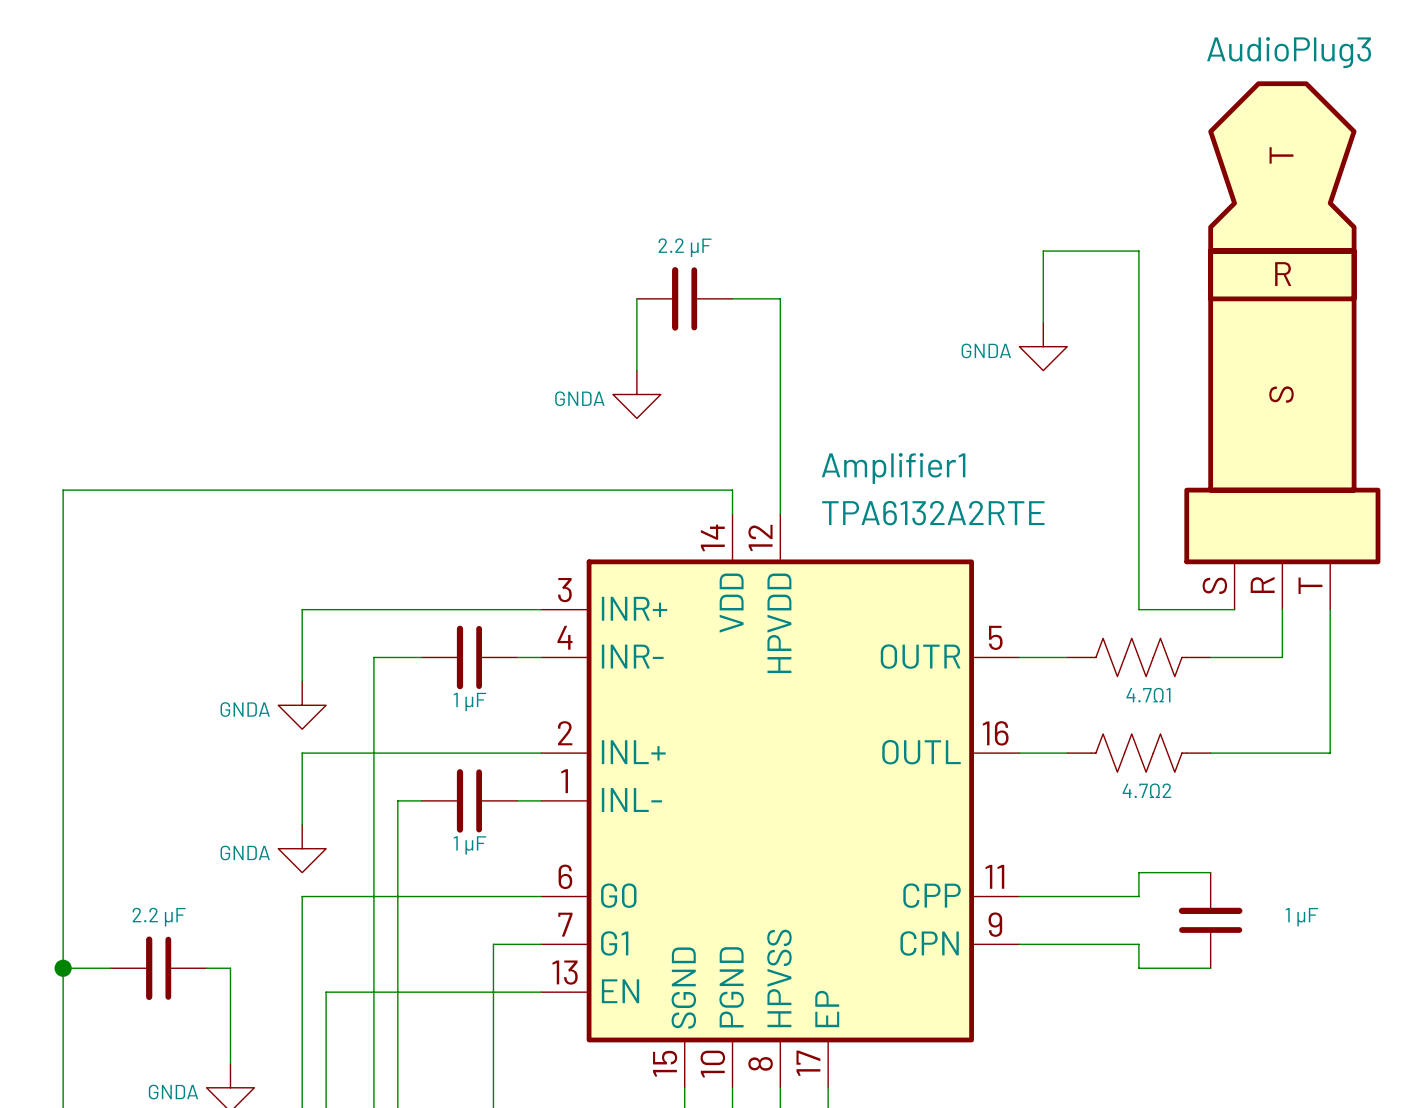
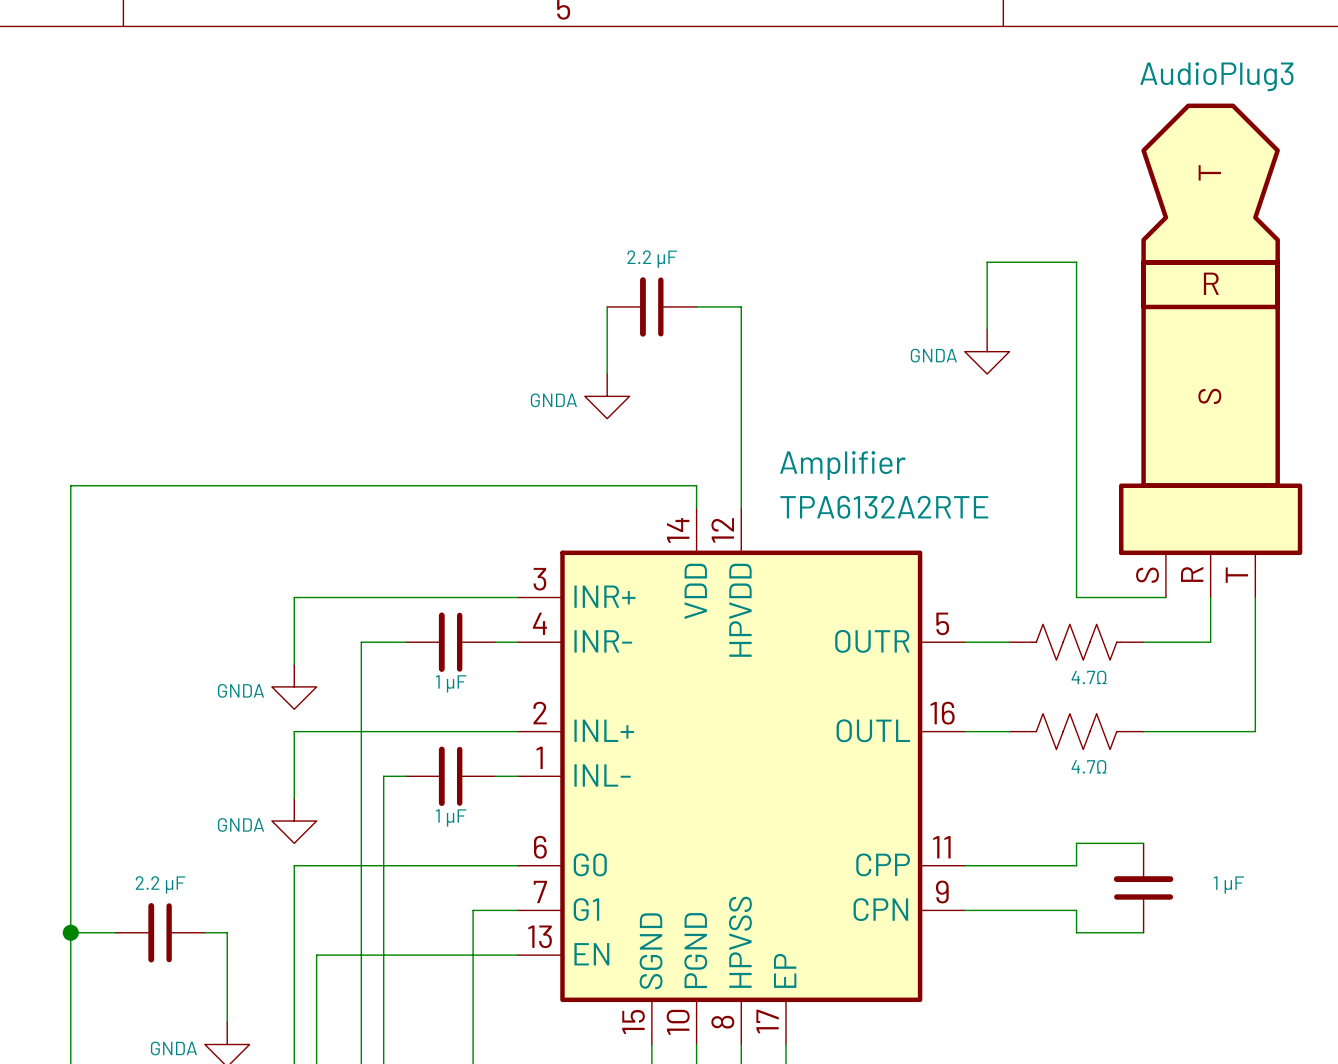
Amplifier1 name: Amplifier1 (893, 468) -> Amplifier (842, 465)
4.7Ω1 name: 4.7Ω1 (1148, 695) -> 4.7Ω (1089, 677)
4.7Ω2 name: 4.7Ω2 (1146, 790) -> 4.7Ω (1089, 766)

